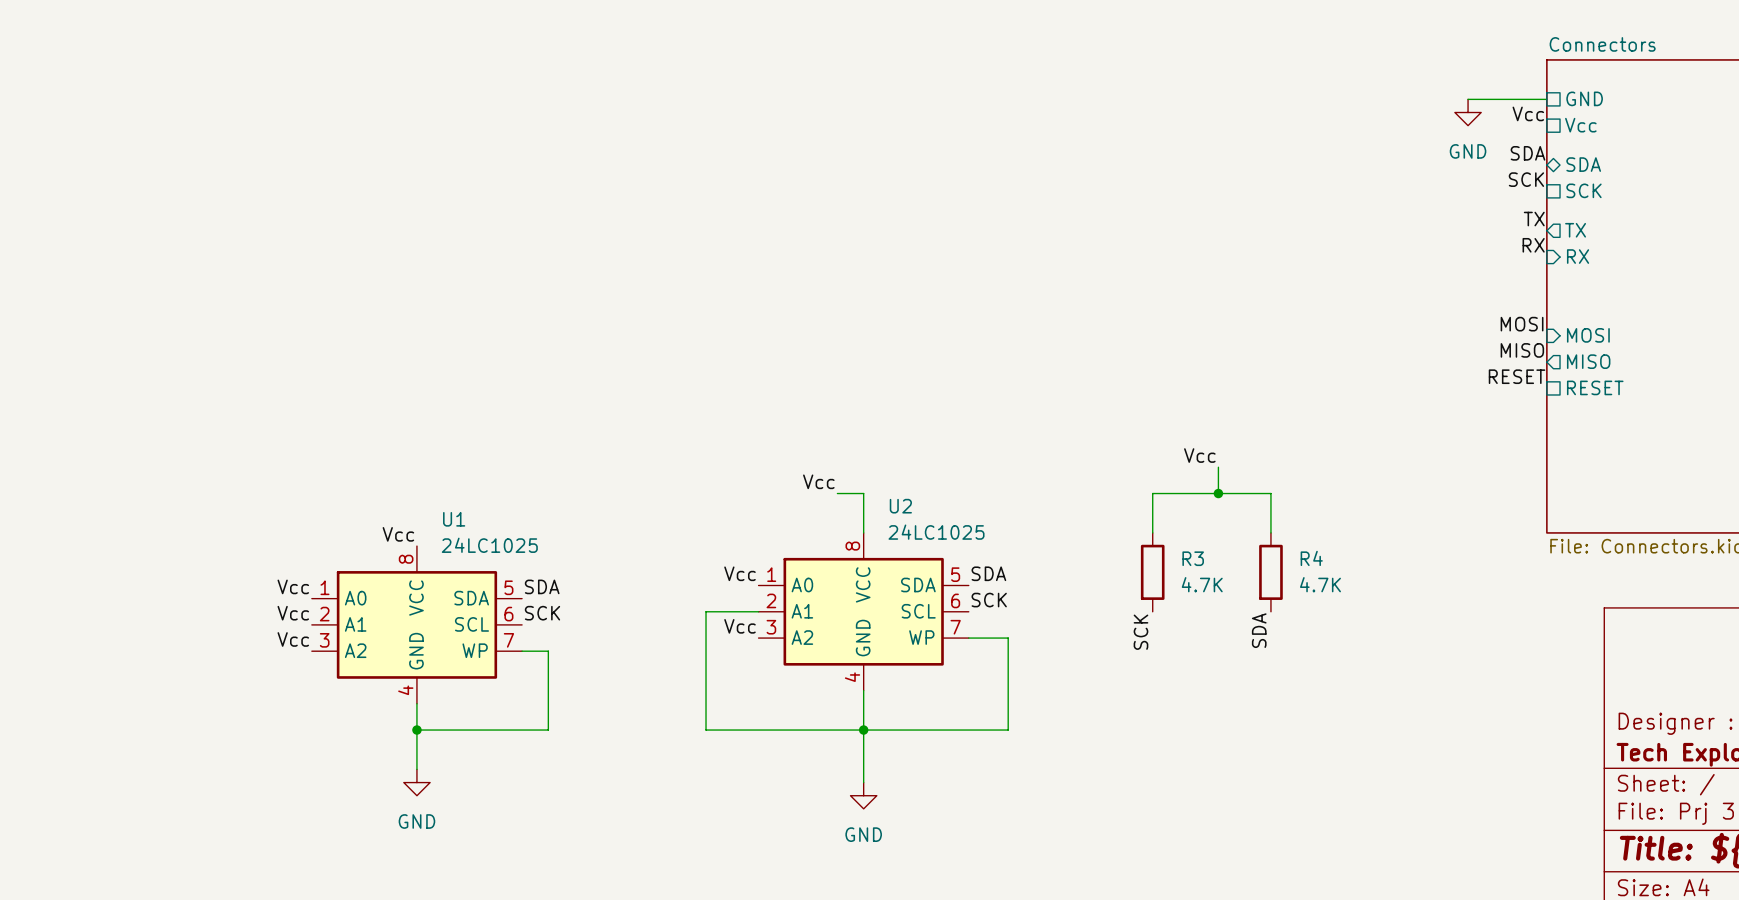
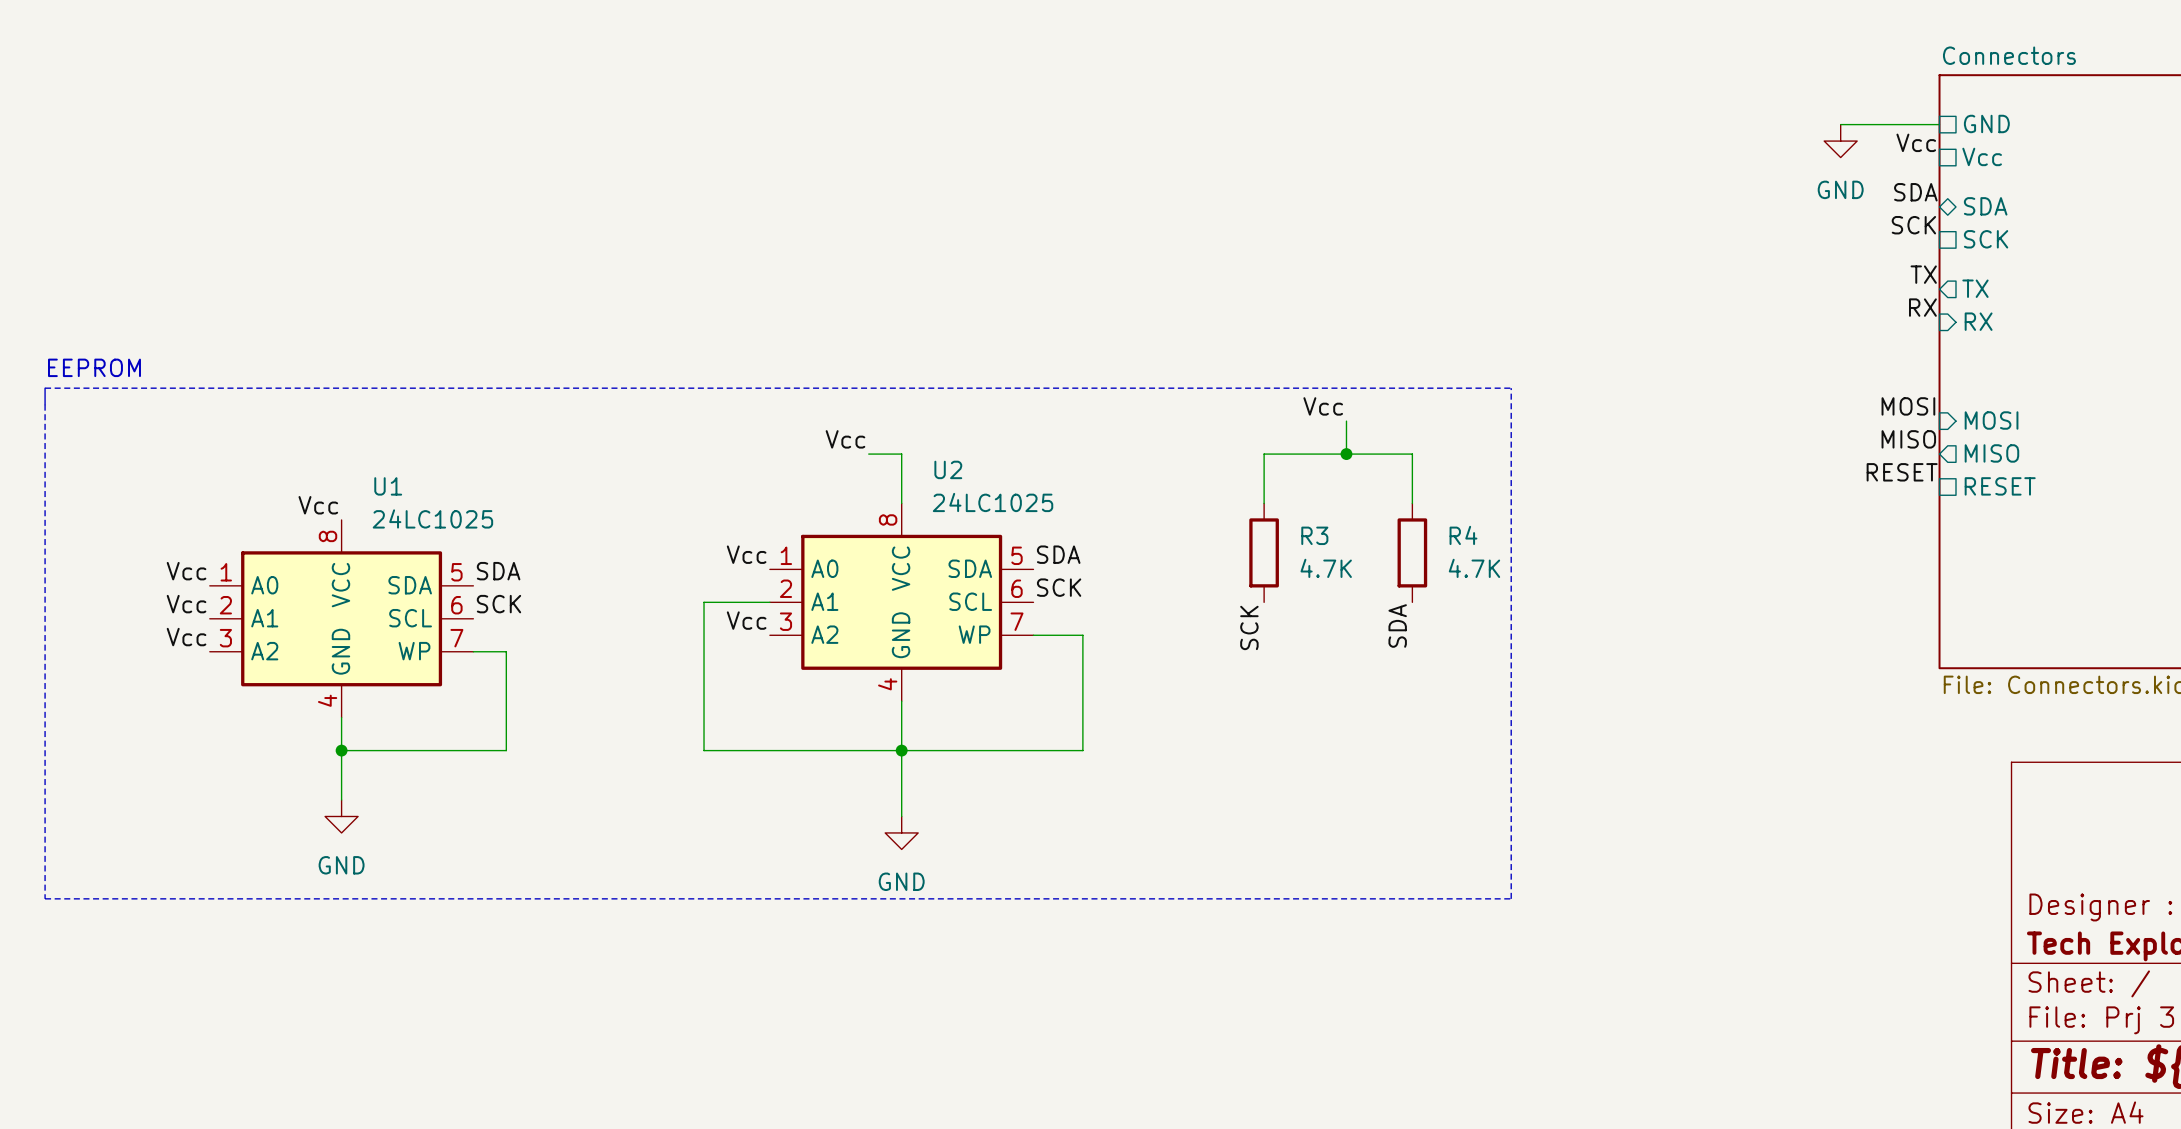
text: none -> EEPROM (94, 367)
line: none -> (45, 388) (45, 898) (1511, 898) (1511, 388) (45, 388)
label: none -> Vcc (1323, 406)
label: none -> Vcc (845, 439)
wire: none -> (868, 454) (901, 454) (901, 503)
junction: none -> (1346, 454)
label: none -> Vcc (318, 505)
label: none -> Vcc (746, 554)
label: none -> SDA (1058, 554)
label: none -> Vcc (186, 571)
label: none -> SDA (498, 571)
label: Vcc (1199, 455) -> none
wire: (1218, 467) (1218, 493) -> (1346, 421) (1346, 454)
label: none -> SCK (1059, 587)
wire: none -> (769, 602) (704, 602) (704, 750) (1082, 750) (1082, 668)
label: none -> Vcc (186, 604)
label: none -> SCK (498, 604)
label: Vcc (818, 481) -> none
wire: (837, 493) (863, 493) (863, 506) -> (1033, 635) (1082, 635)
junction: (1218, 493) -> none
label: none -> Vcc (746, 620)
label: none -> SDA (1397, 625)
label: none -> SCK (1249, 627)
label: none -> Vcc (186, 637)
wire: (1152, 532) (1152, 493) (1270, 493) (1270, 532) -> (1264, 503) (1264, 454) (1412, 454) (1412, 503)
label: Vcc (398, 534) -> none
R3 position: (1152, 572) -> (1264, 552)
R4 position: (1270, 572) -> (1412, 552)
label: Vcc (740, 573) -> none
label: SDA (988, 573) -> none
label: Vcc (293, 586) -> none
label: SDA (542, 586) -> none
junction: none -> (341, 750)
junction: none -> (901, 750)
label: SCK (989, 600) -> none
wire: (758, 611) (706, 611) (706, 730) (1008, 730) (1008, 638) (968, 638) -> none
U2 position: (863, 611) -> (901, 602)
label: Vcc (293, 613) -> none
label: SCK (542, 613) -> none
U1 position: (416, 624) -> (341, 618)
label: Vcc (740, 626) -> none
label: SDA (1259, 630) -> none
label: SCK (1140, 632) -> none
label: Vcc (293, 639) -> none
power symbol: none -> GND (341, 816)
wire: (522, 651) (548, 651) (548, 730) (416, 730) -> (473, 651) (506, 651) (506, 750) (341, 750)
power symbol: none -> GND (901, 832)
wire: (863, 690) (863, 782) -> (901, 701) (901, 816)
wire: (416, 703) (416, 769) -> (341, 717) (341, 800)
junction: (416, 730) -> none
junction: (863, 730) -> none
power symbol: GND (416, 782) -> none
power symbol: GND (863, 795) -> none

